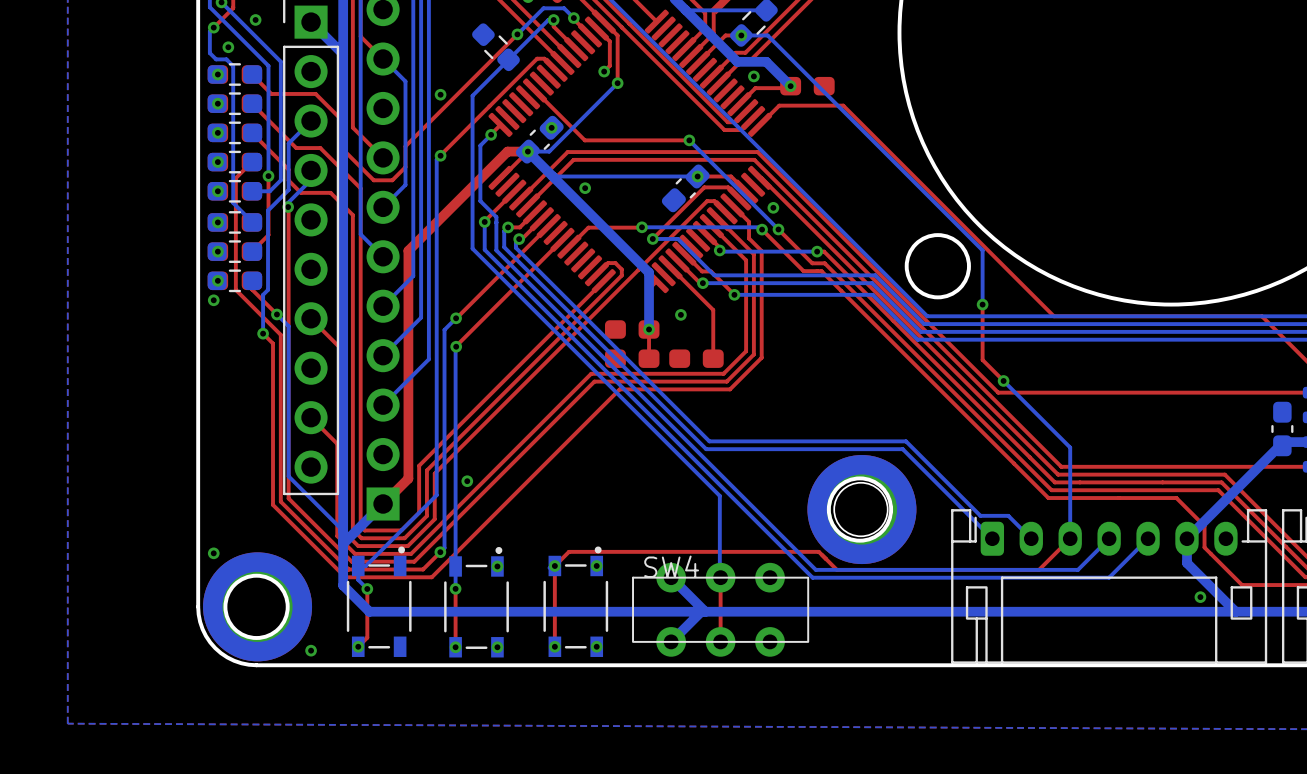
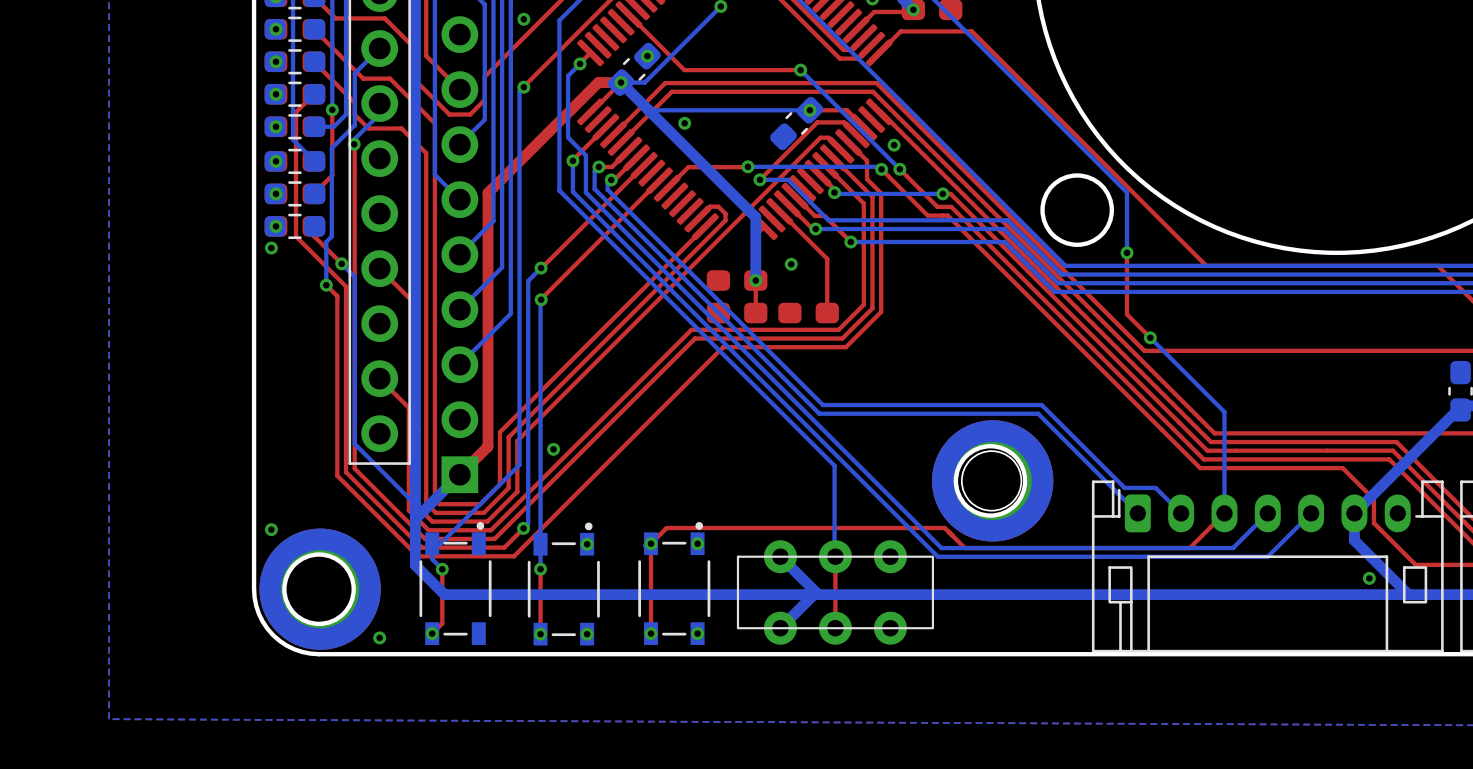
SW4 name: SW4 (671, 566) -> none

